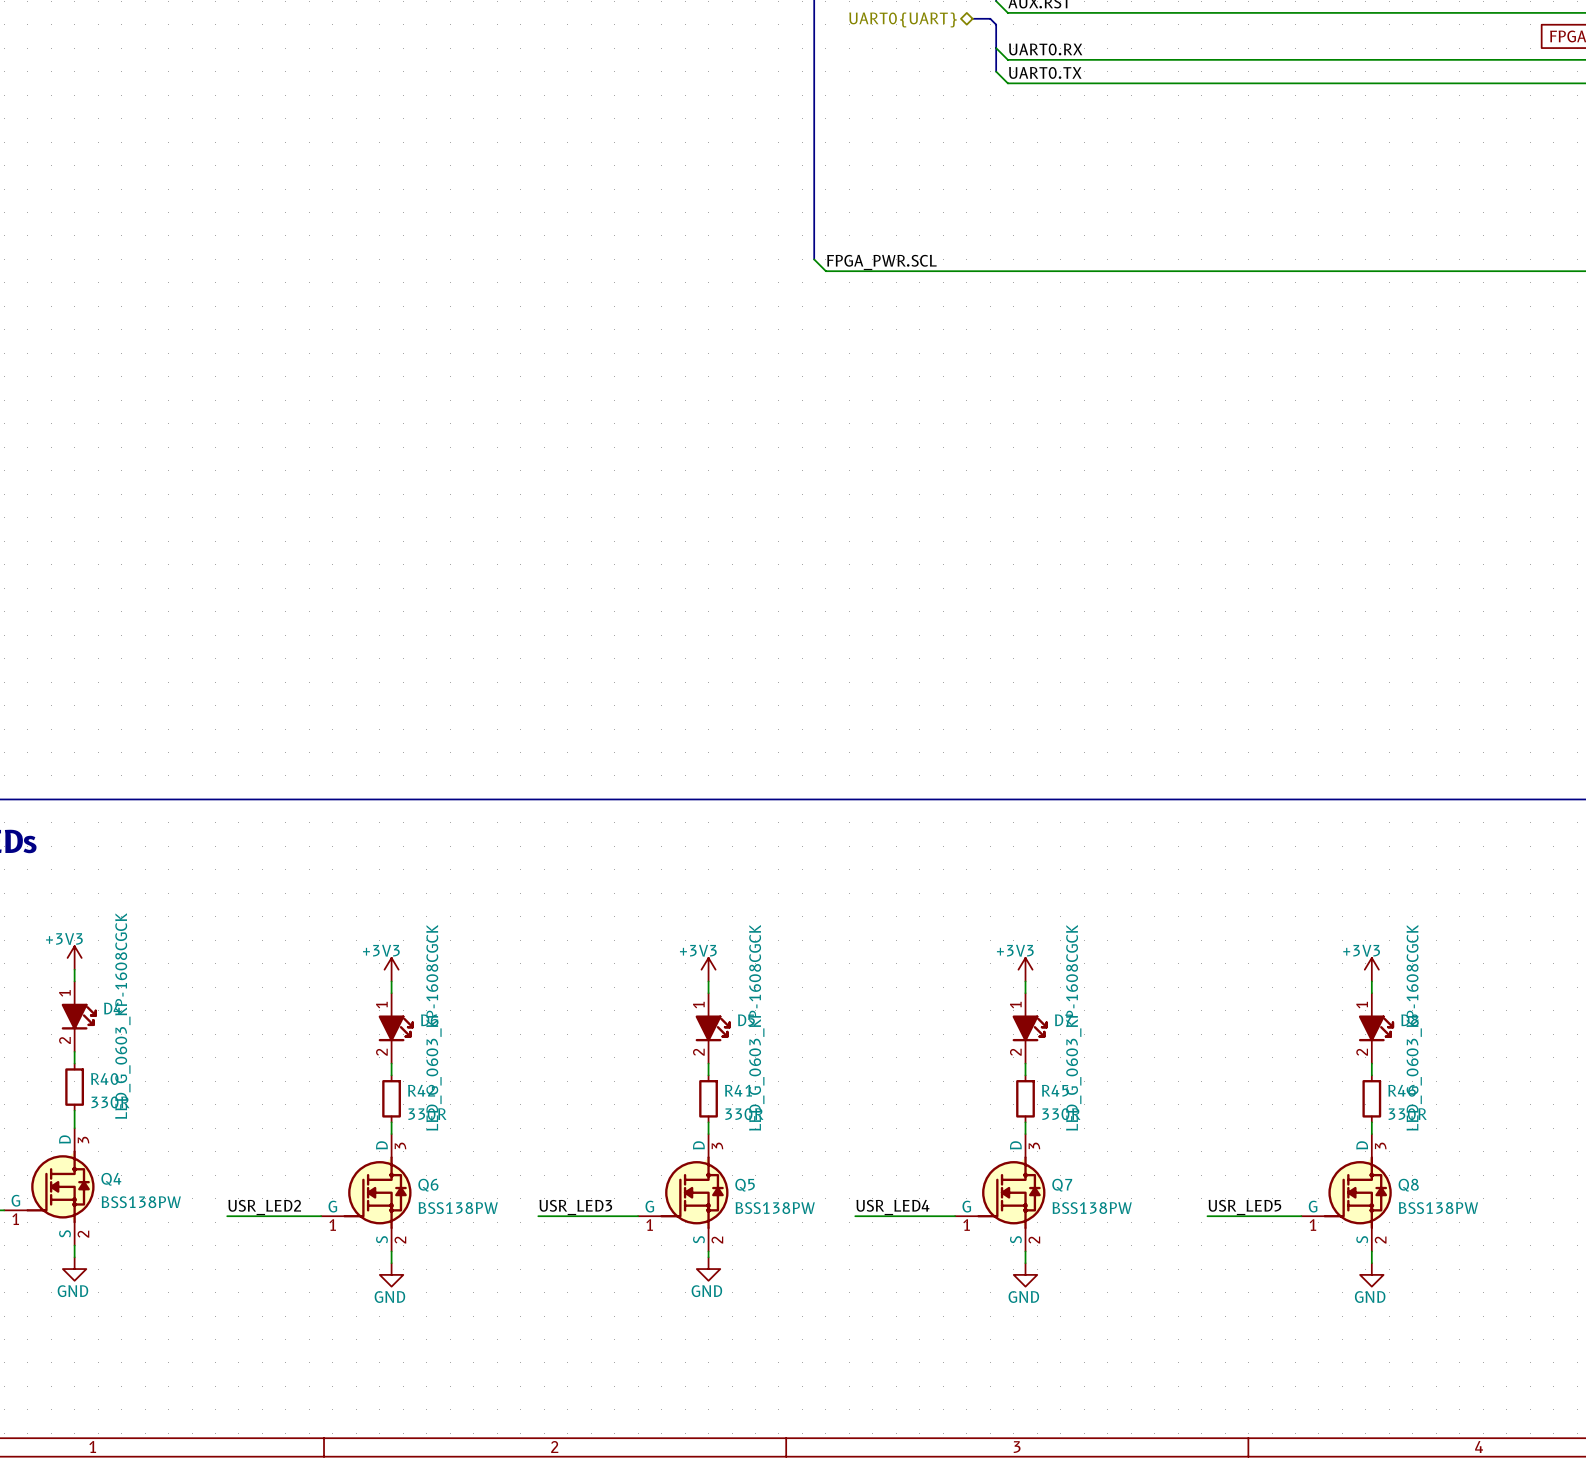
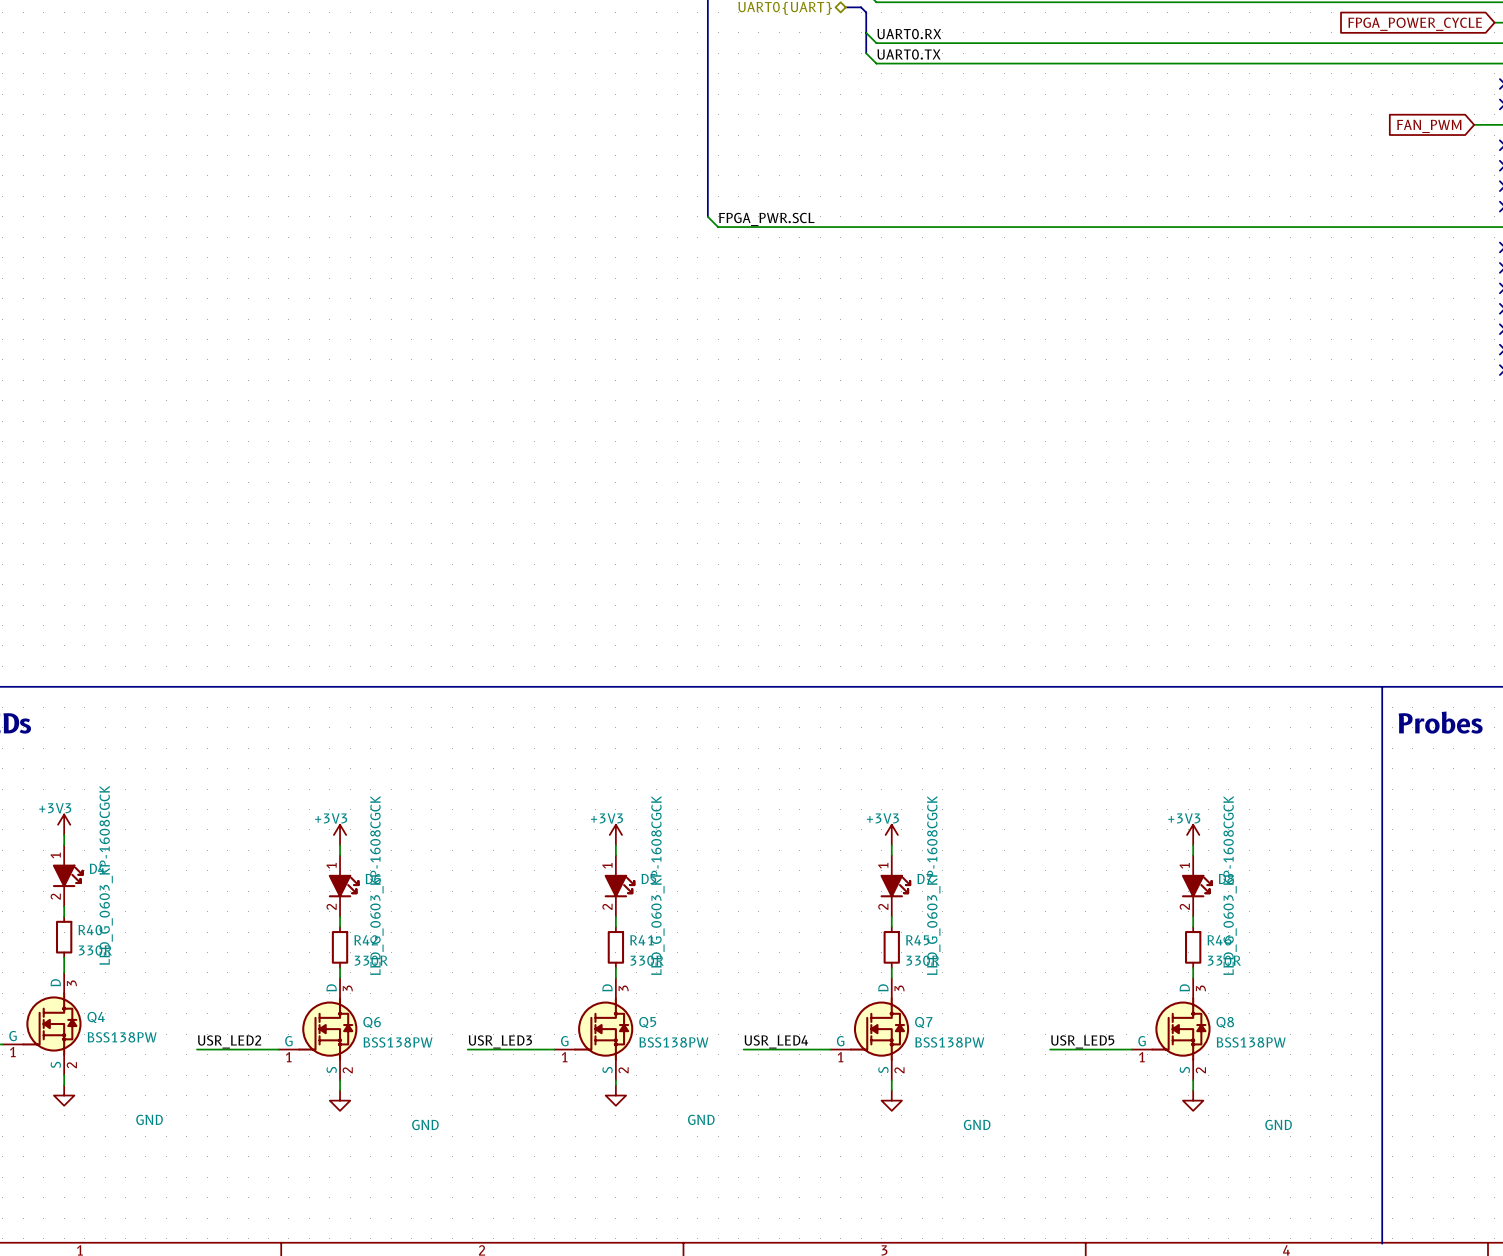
power symbol text position: GND (72, 1291) -> GND (149, 1119)
power symbol text position: GND (706, 1291) -> GND (701, 1119)
power symbol text position: GND (389, 1297) -> GND (425, 1124)
power symbol text position: GND (1023, 1297) -> GND (977, 1124)
power symbol text position: GND (1370, 1297) -> GND (1278, 1124)

